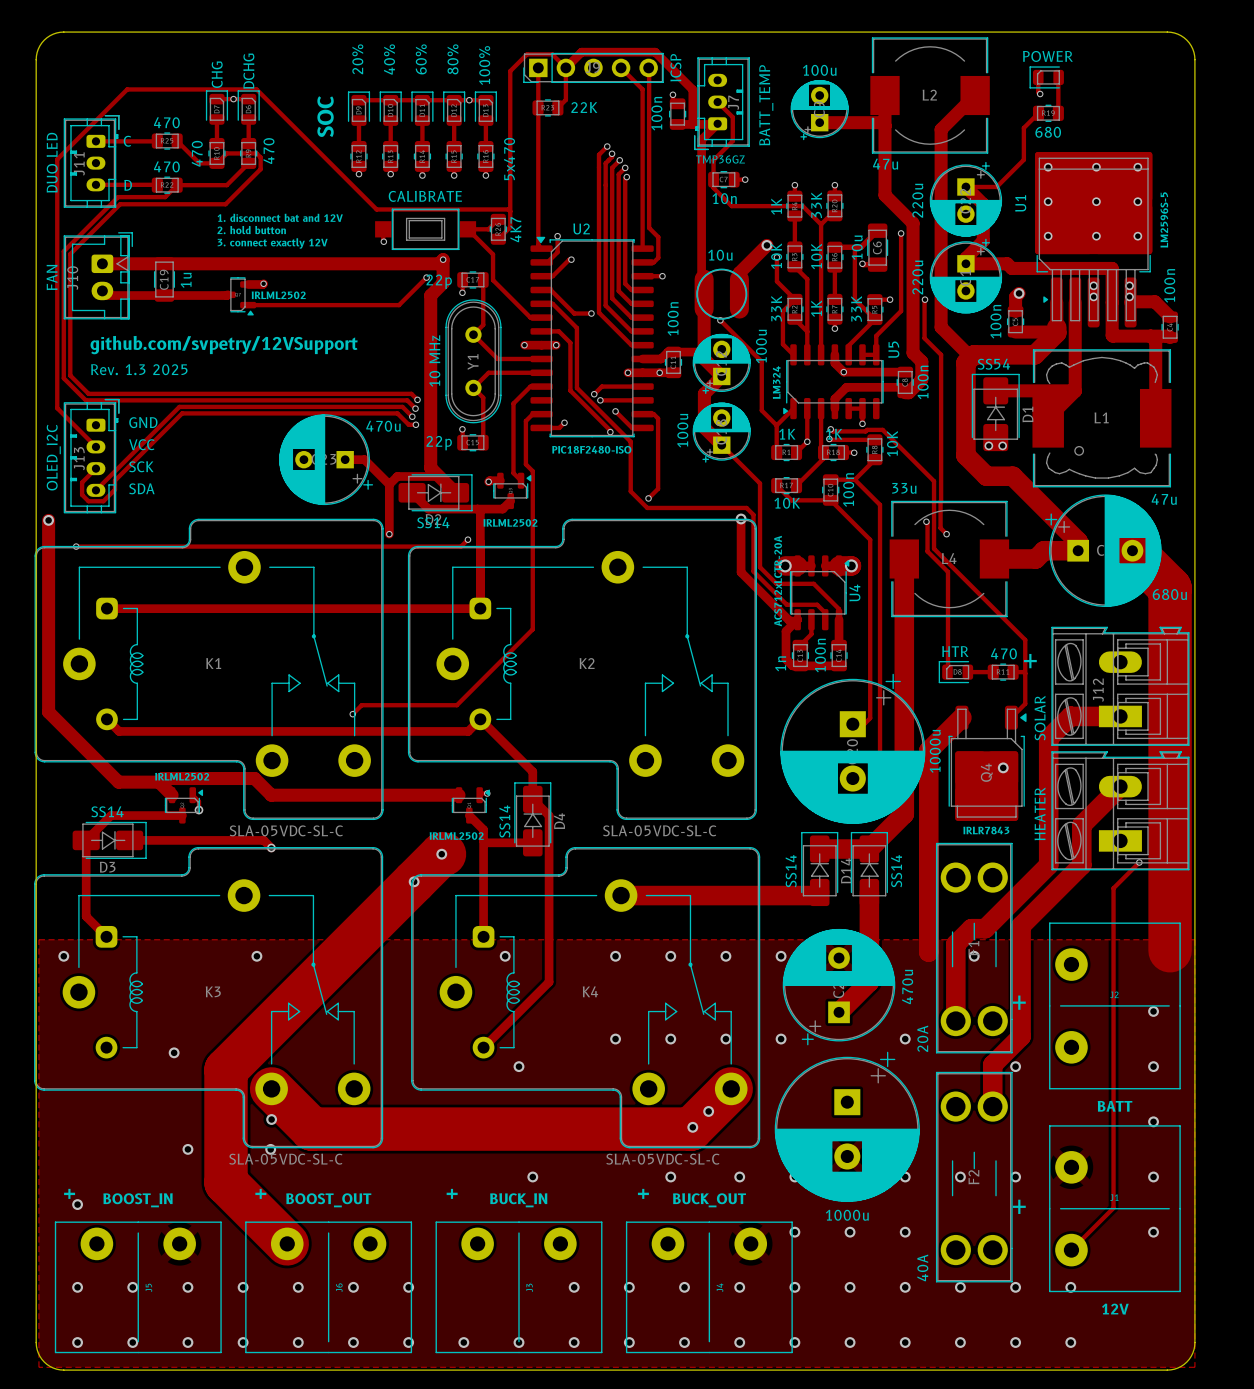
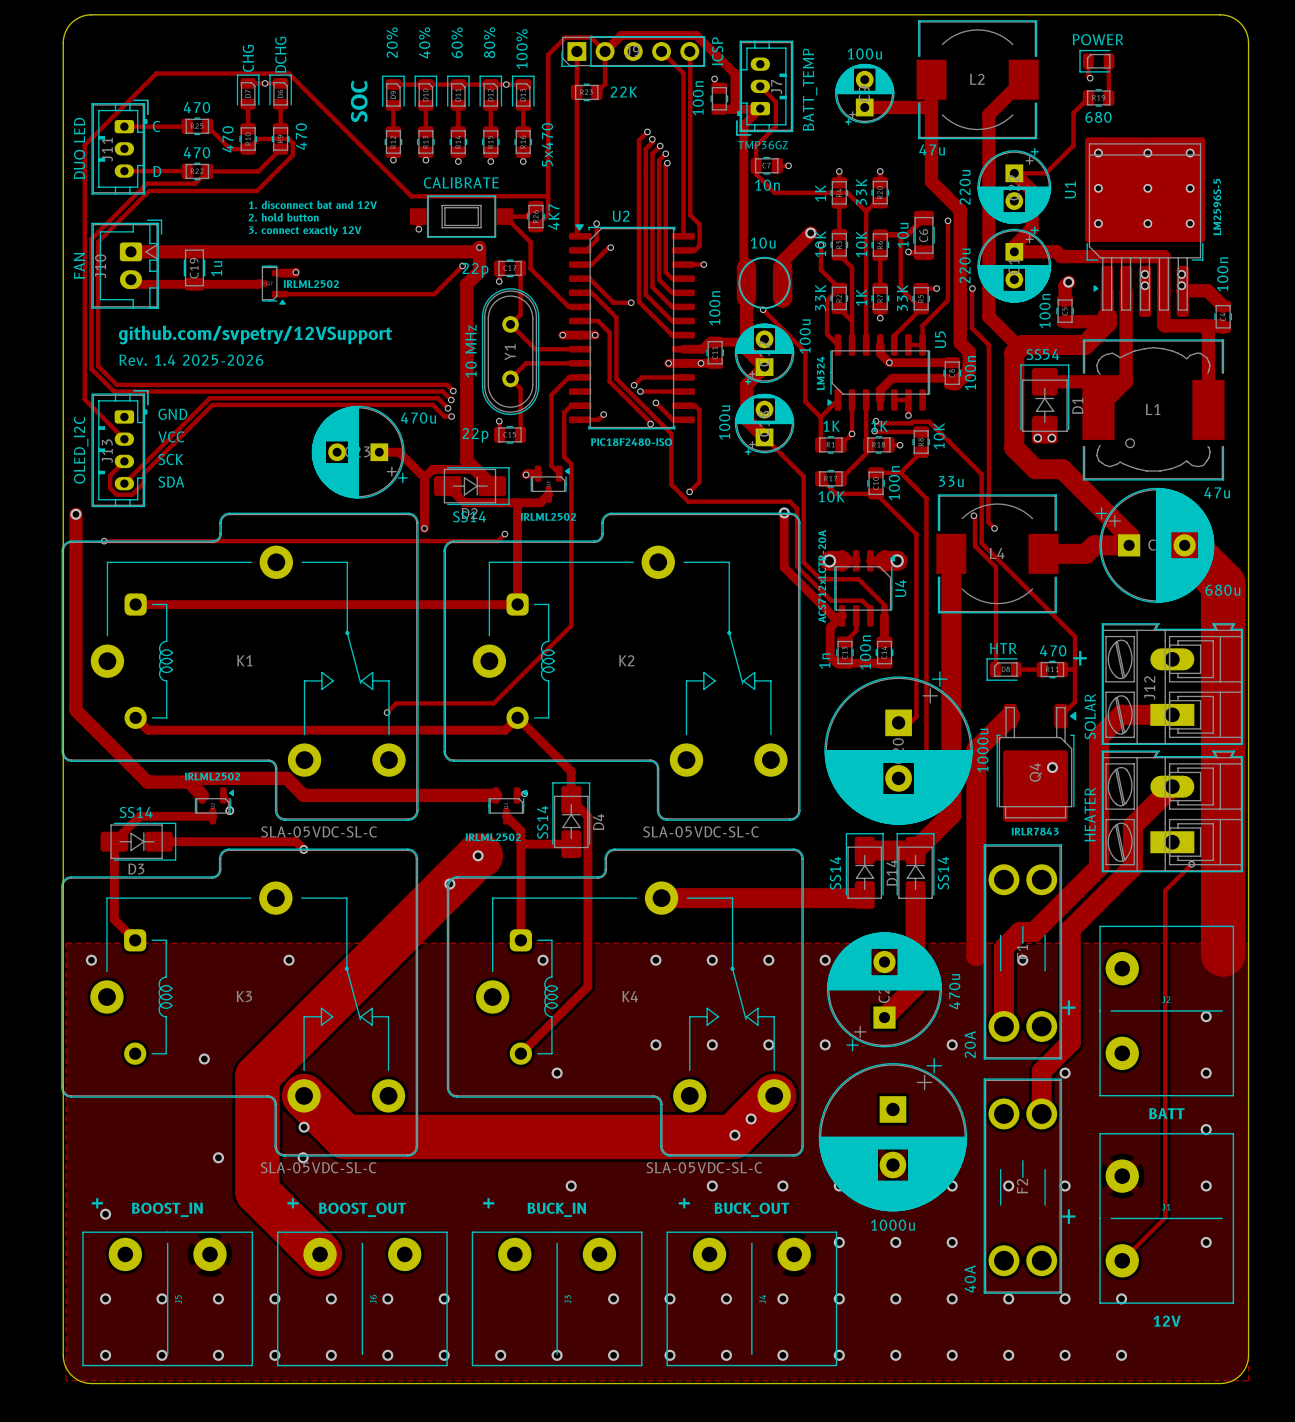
text: Rev. 1.3 2025 (139, 369) -> Rev. 1.4 2025-2026 (191, 360)

